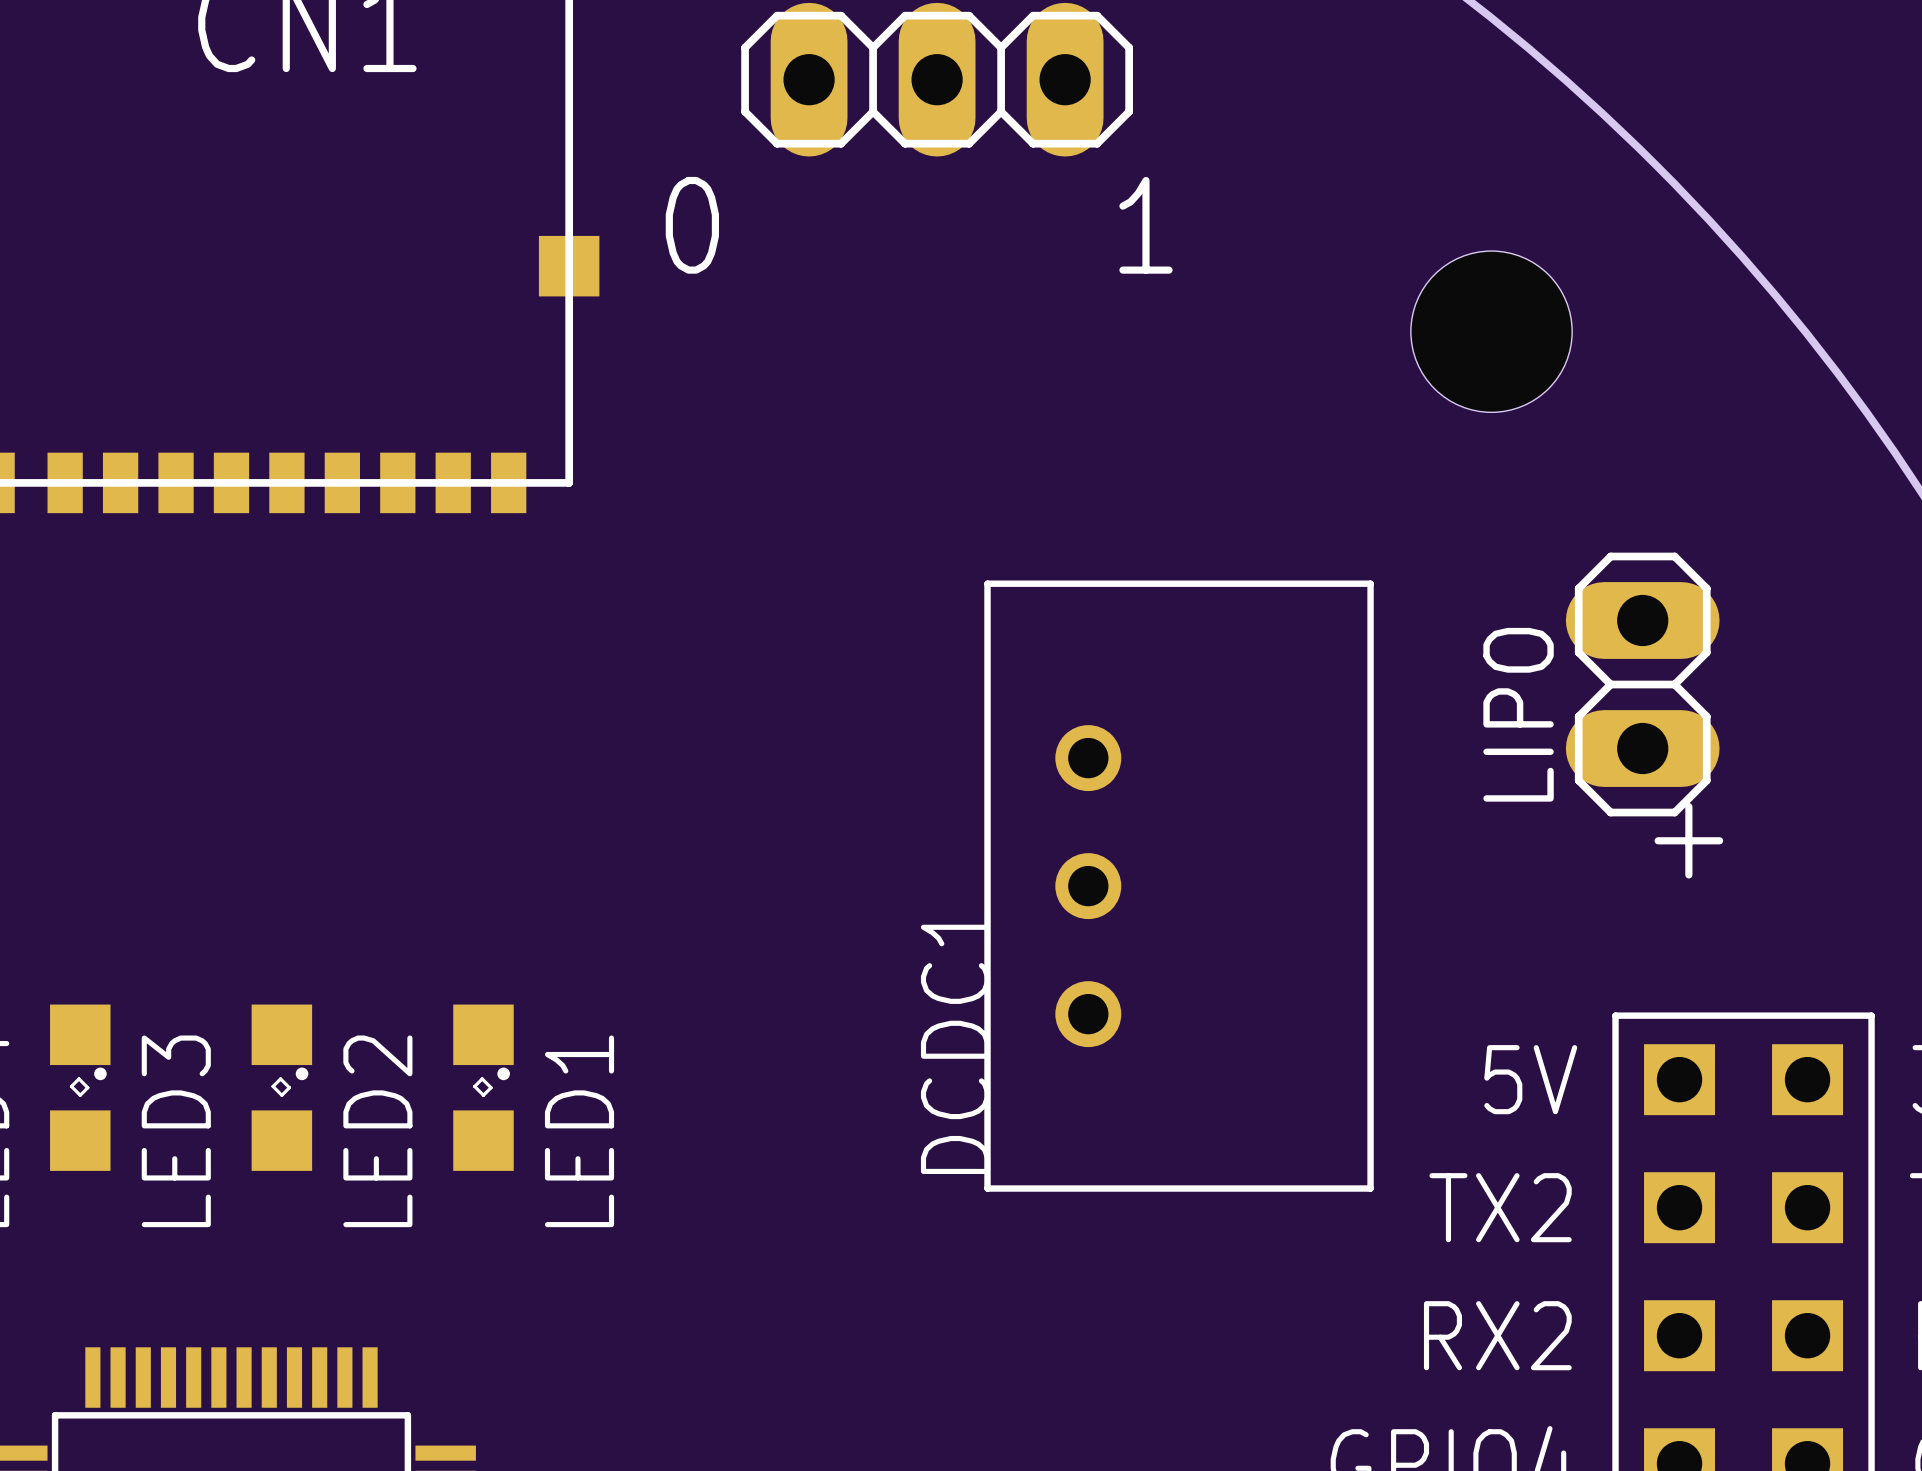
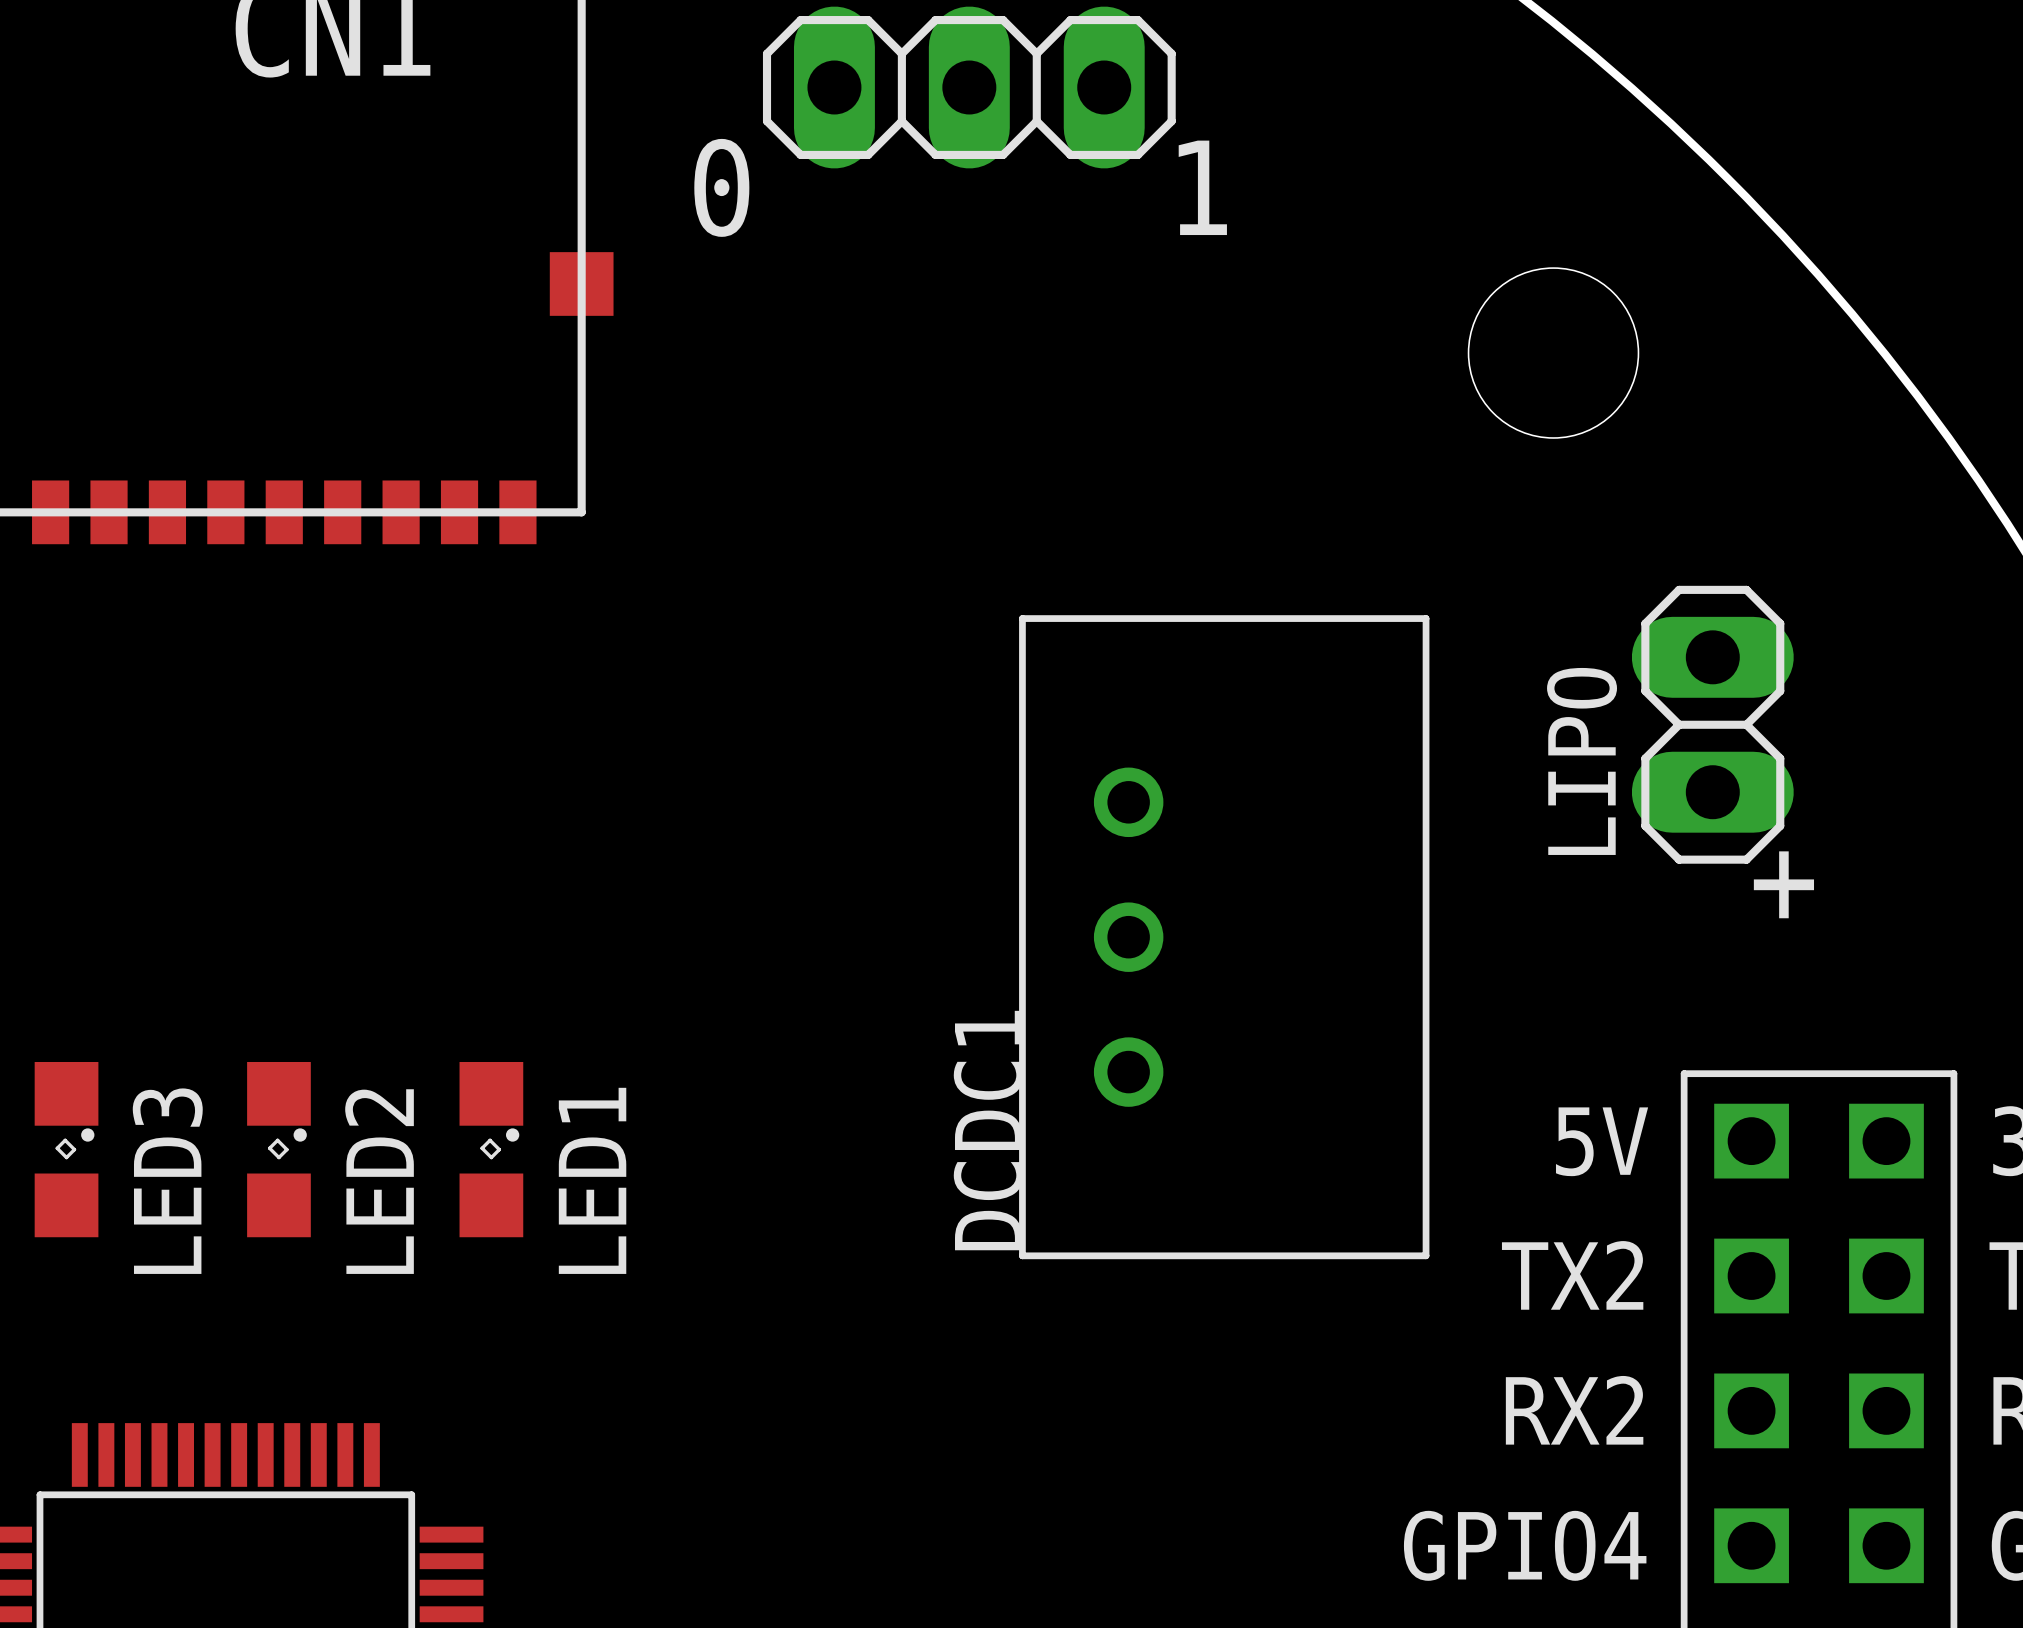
text position: 0 (692, 225) -> 0 (721, 187)
text position: 1 (1145, 225) -> 1 (1202, 187)

